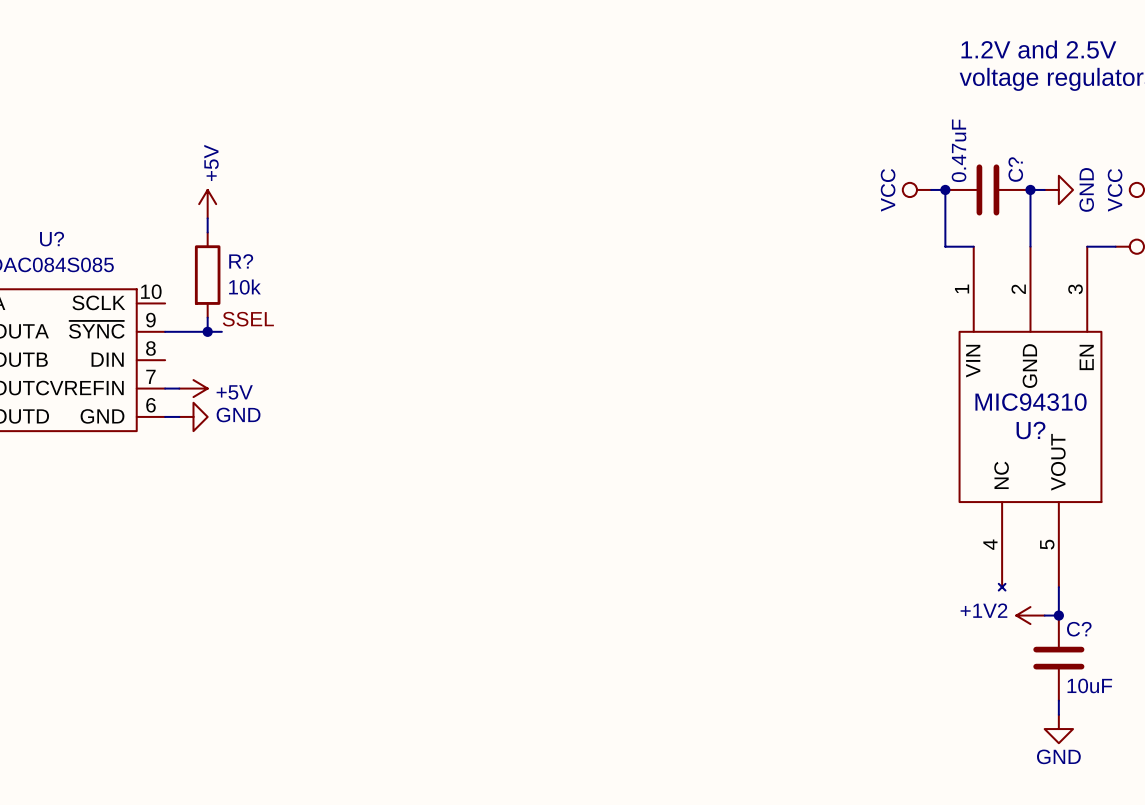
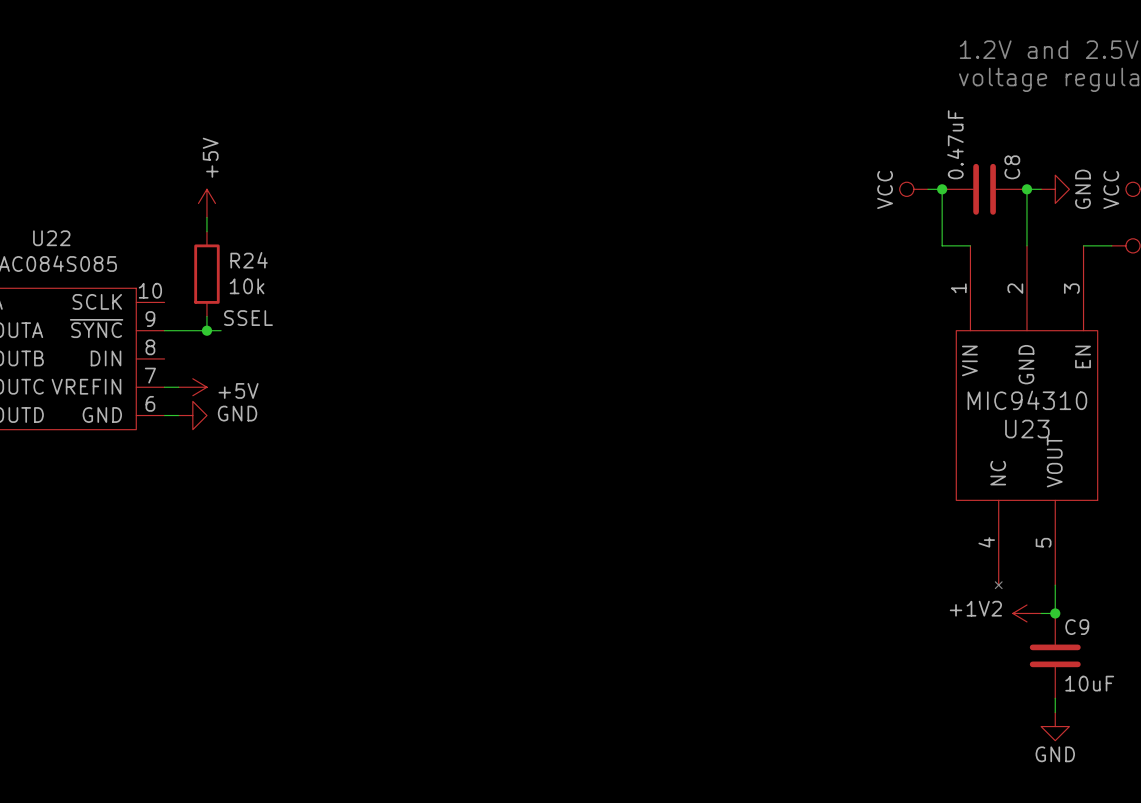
C? name: C? (1015, 169) -> C8 (1012, 167)
U? name: U? (52, 239) -> U22 (51, 238)
R? name: R? (241, 261) -> R24 (249, 260)
U? name: U? (1030, 430) -> U23 (1027, 429)
C? name: C? (1079, 629) -> C9 (1077, 627)

